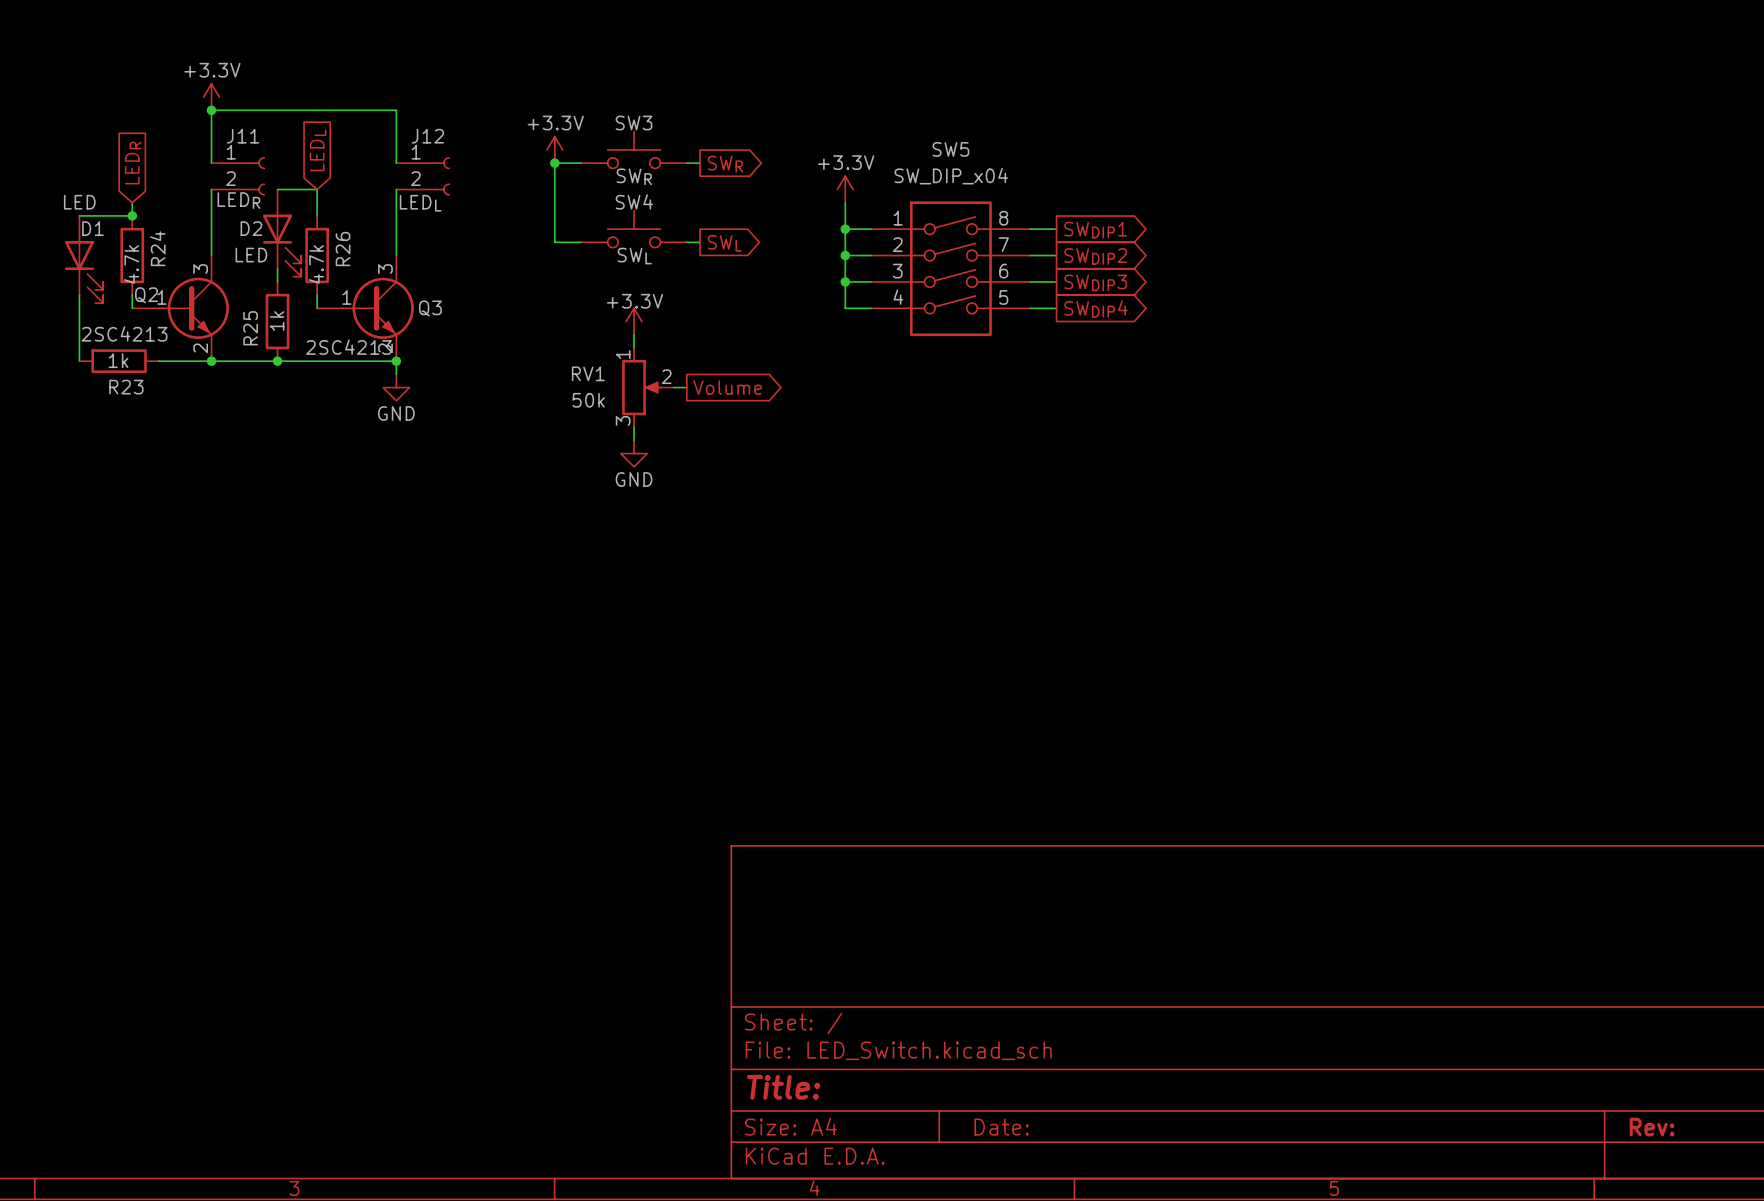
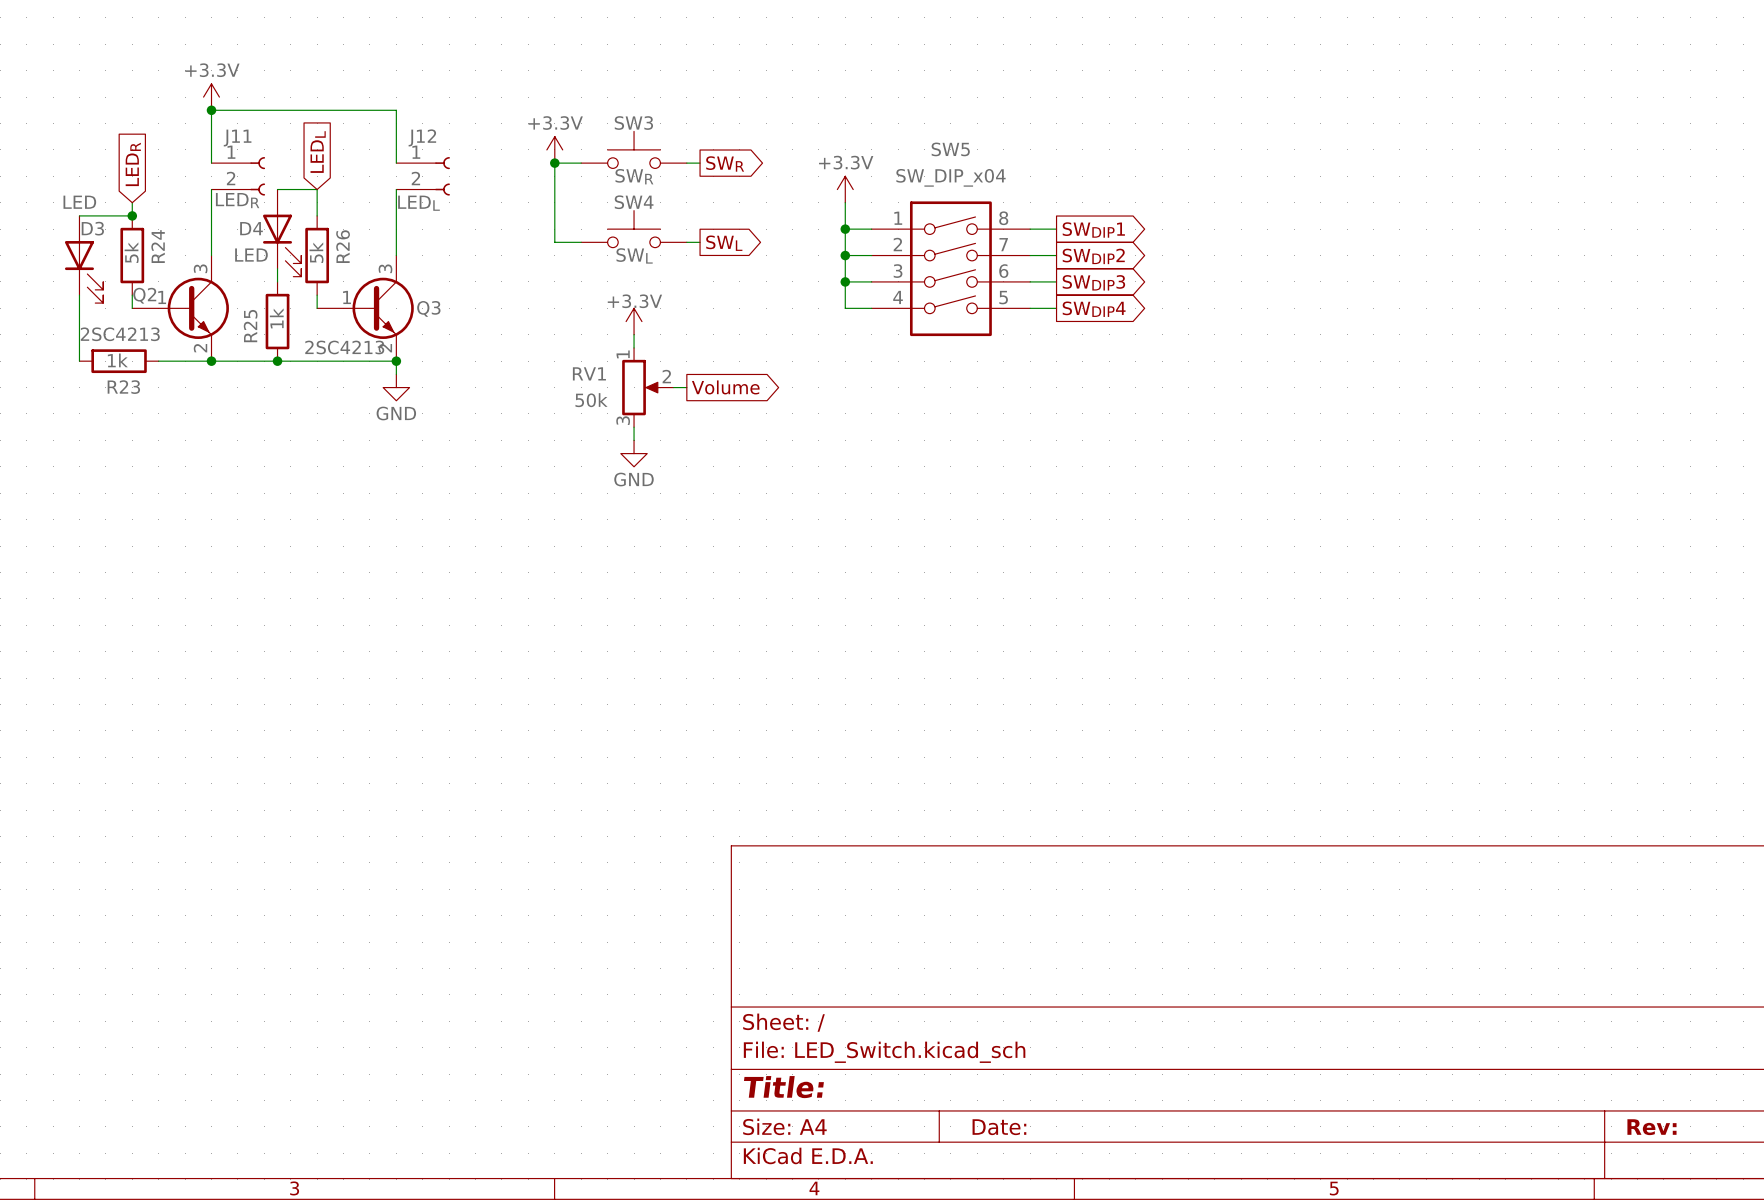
D1 name: D1 (92, 228) -> D3 (92, 228)
D2 name: D2 (251, 228) -> D4 (251, 228)
R24 value: 4.7k (131, 264) -> 5k (131, 252)
R26 value: 4.7k (316, 264) -> 5k (316, 252)

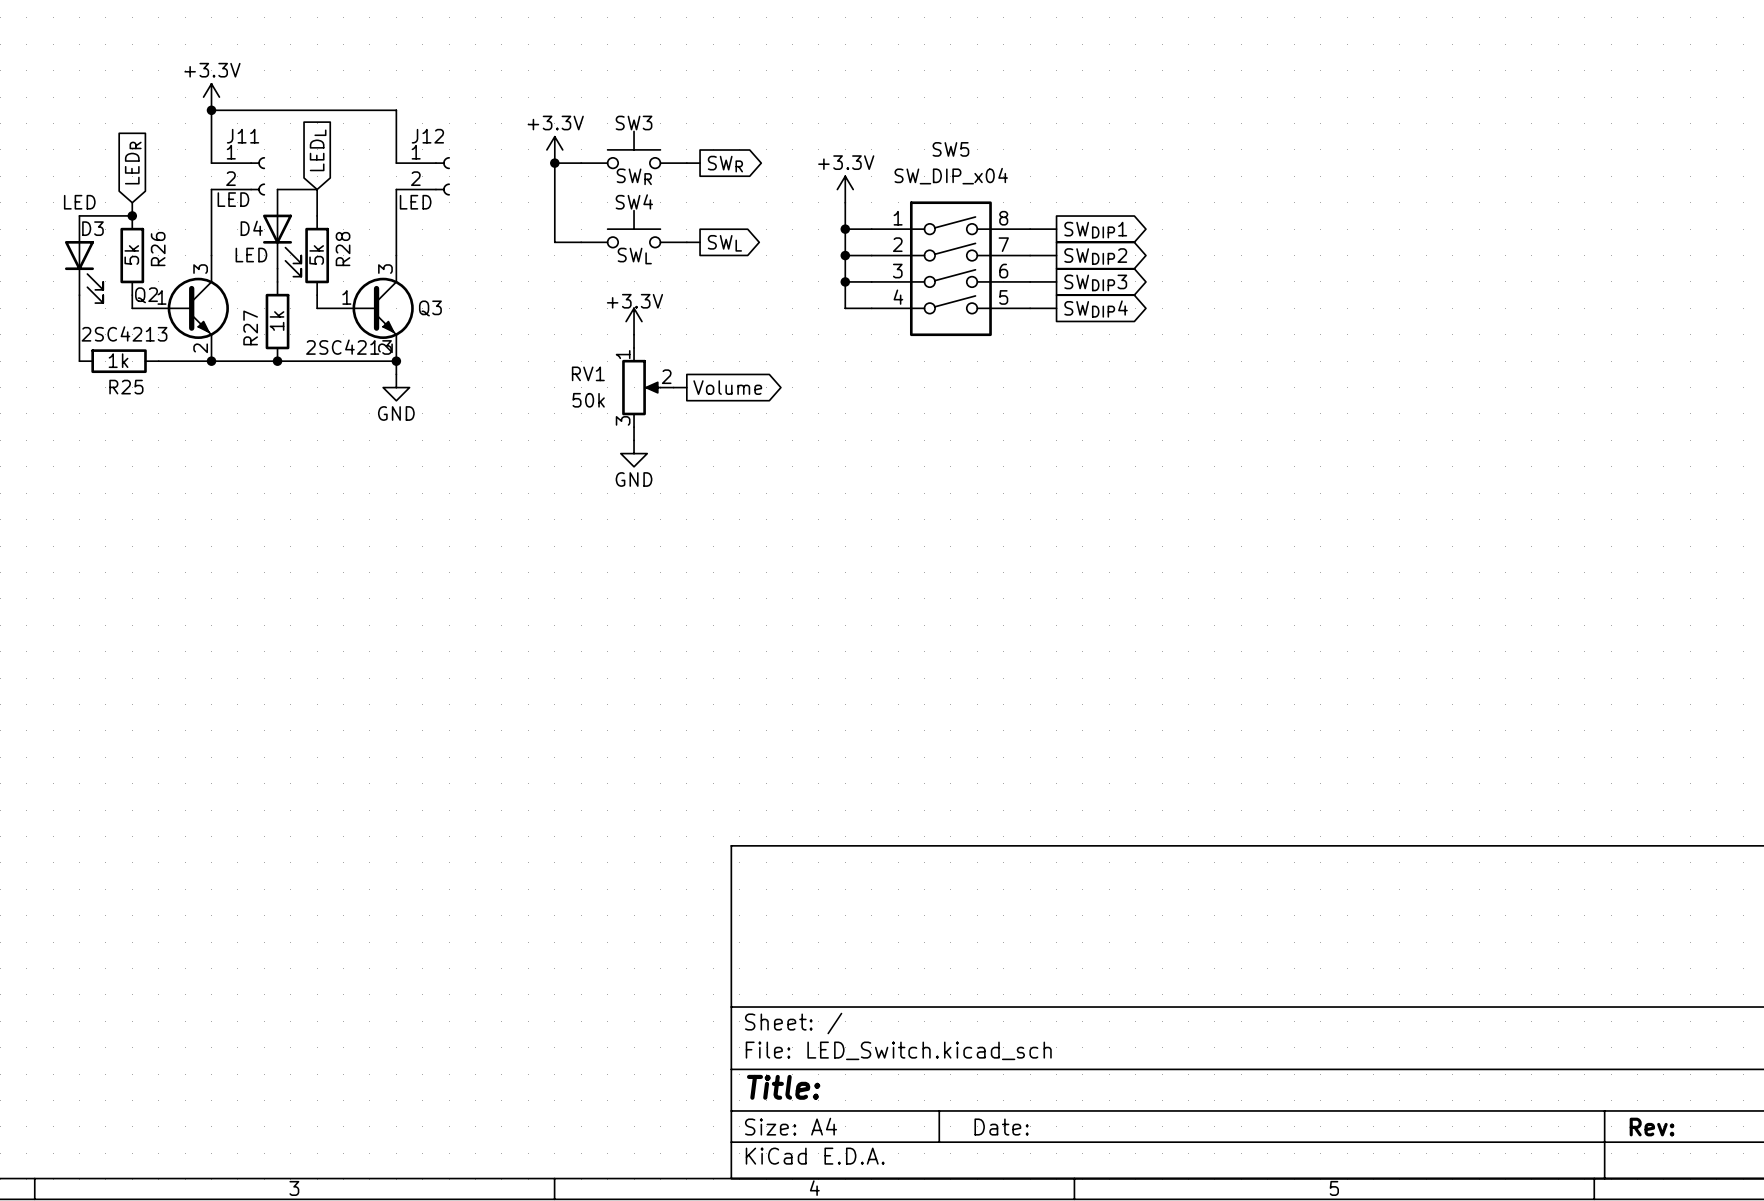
J11 value: LEDR (237, 200) -> LED (233, 199)
J12 value: LEDL (418, 203) -> LED (415, 202)
R24 name: R24 (158, 246) -> R26 (158, 249)
R26 name: R26 (343, 246) -> R28 (343, 249)
R25 name: R25 (250, 326) -> R27 (250, 327)
R23 name: R23 (123, 387) -> R25 (126, 387)

